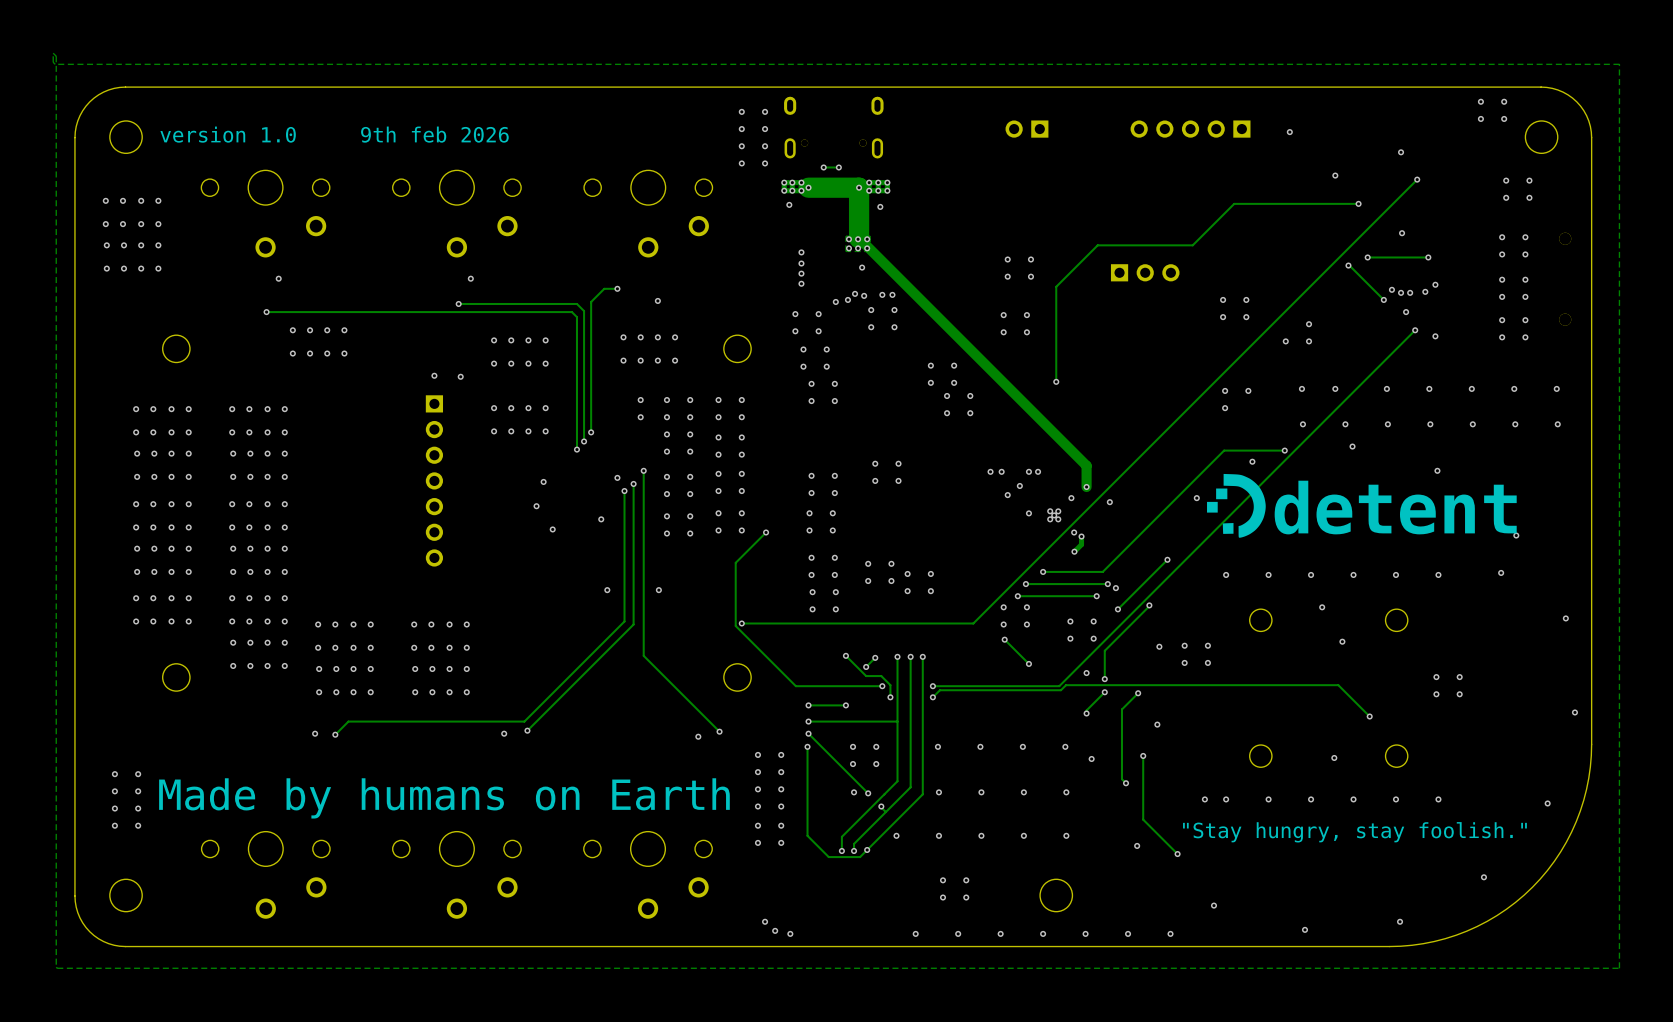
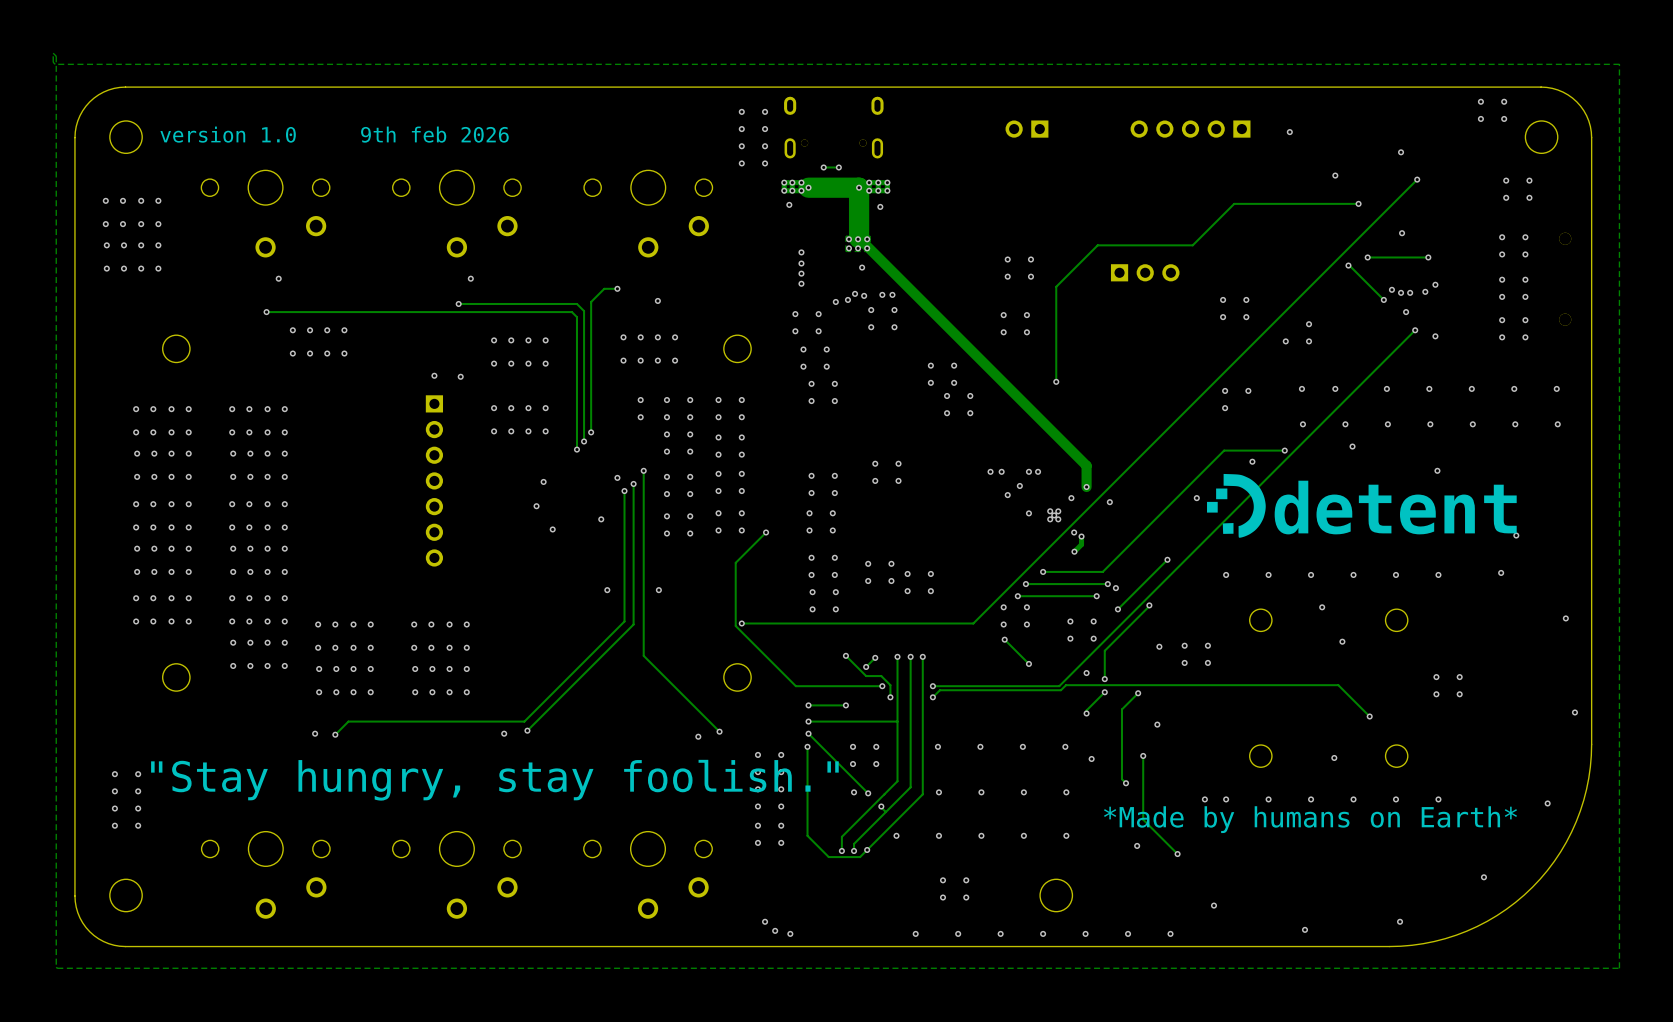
text: none -> "Stay hungry, stay foolish." (494, 780)
text: Made by humans on Earth (444, 798) -> none
text: none -> *Made by humans on Earth* (1310, 819)
text: "Stay hungry, stay foolish." (1354, 832) -> none

